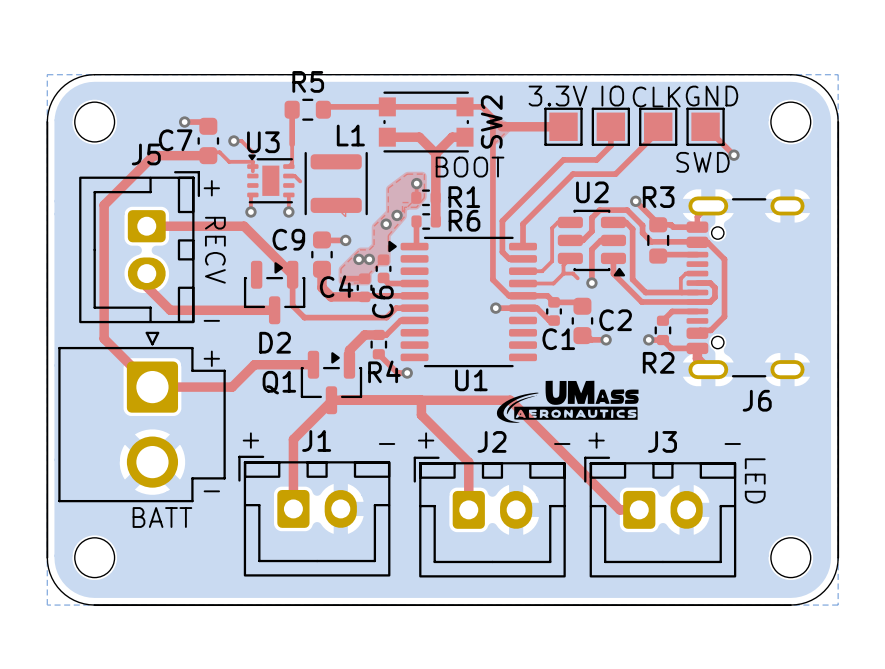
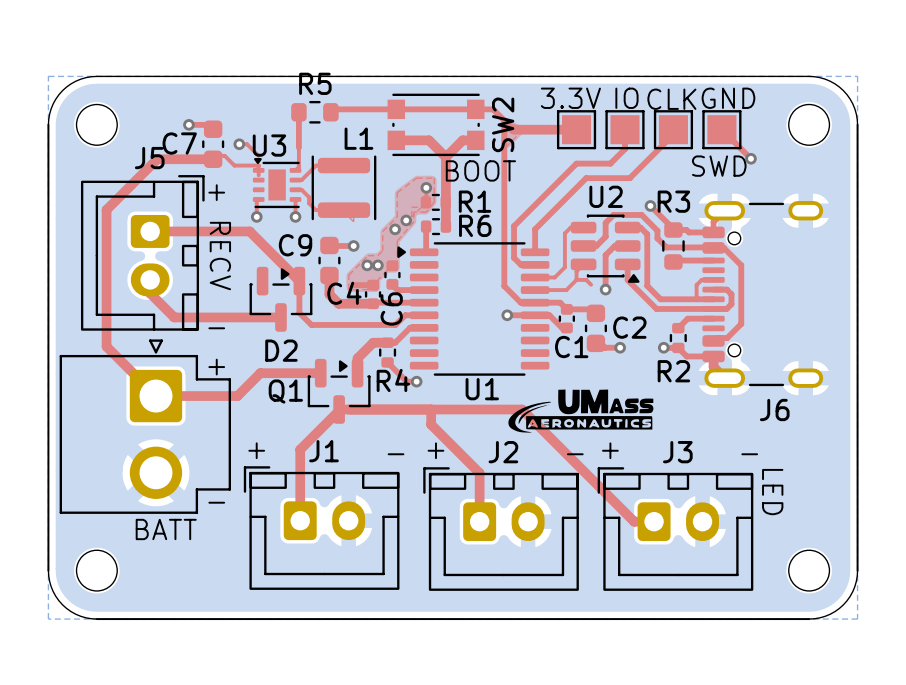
top track: (294, 176) (300, 181) -> (301, 180) (316, 165) (343, 165)
top track: none -> (295, 189) (301, 189) (309, 197) (309, 203) (315, 210) (343, 210)

